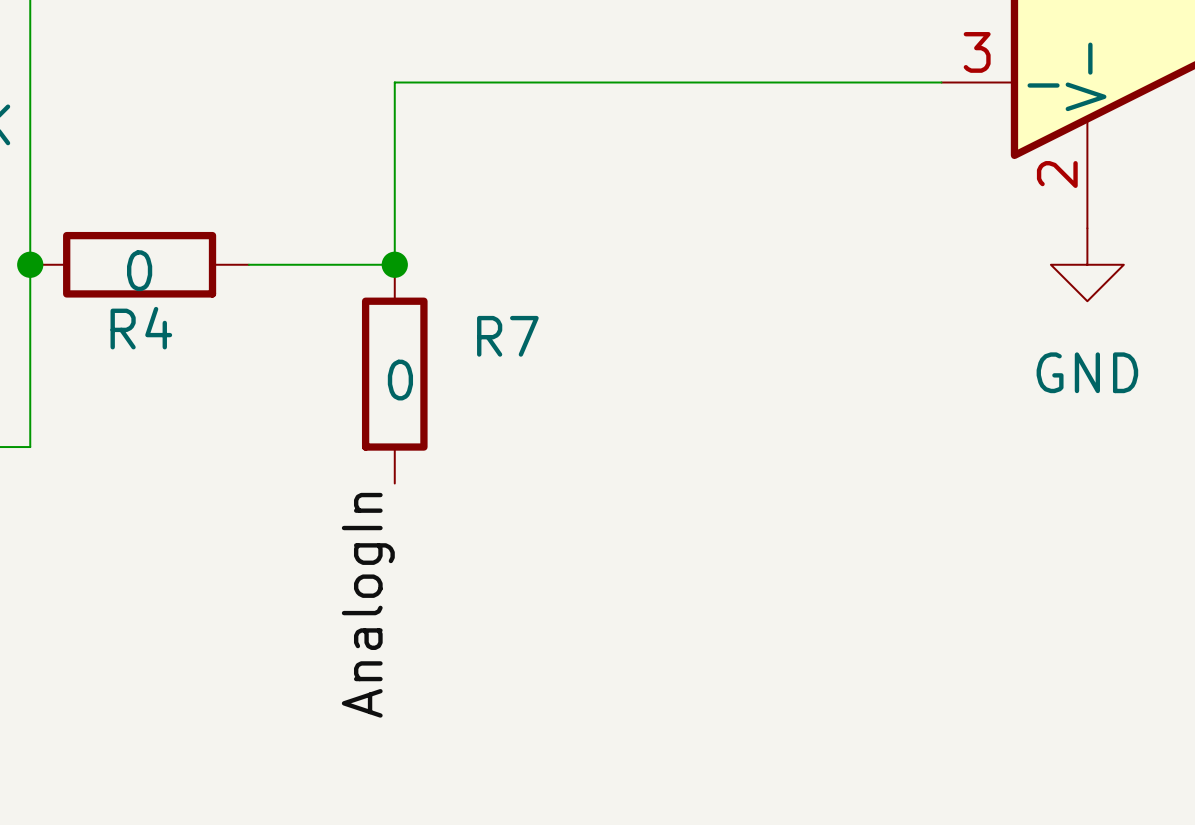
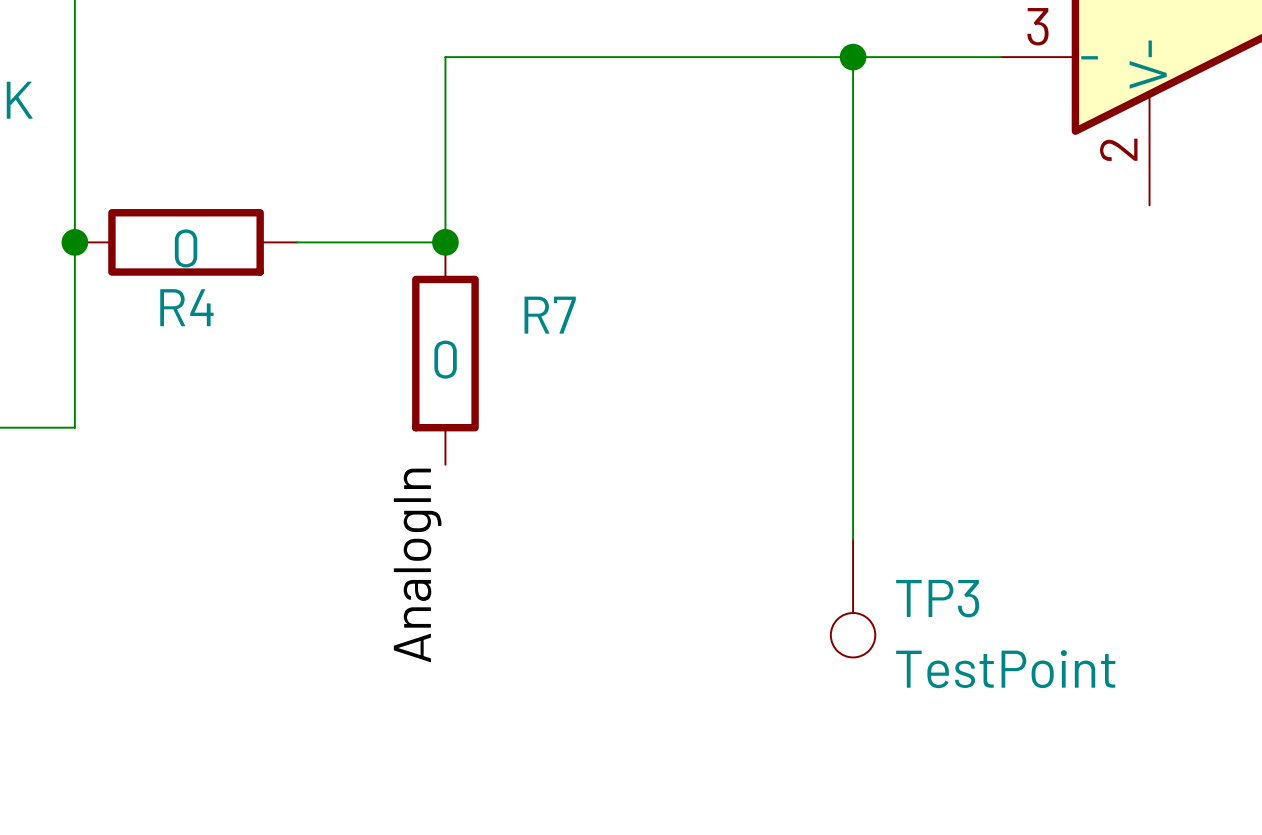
wire: none -> (853, 57) (853, 538)
junction: none -> (853, 57)
power symbol: GND (1087, 264) -> none
TP3: none -> TestPoint (853, 598)

